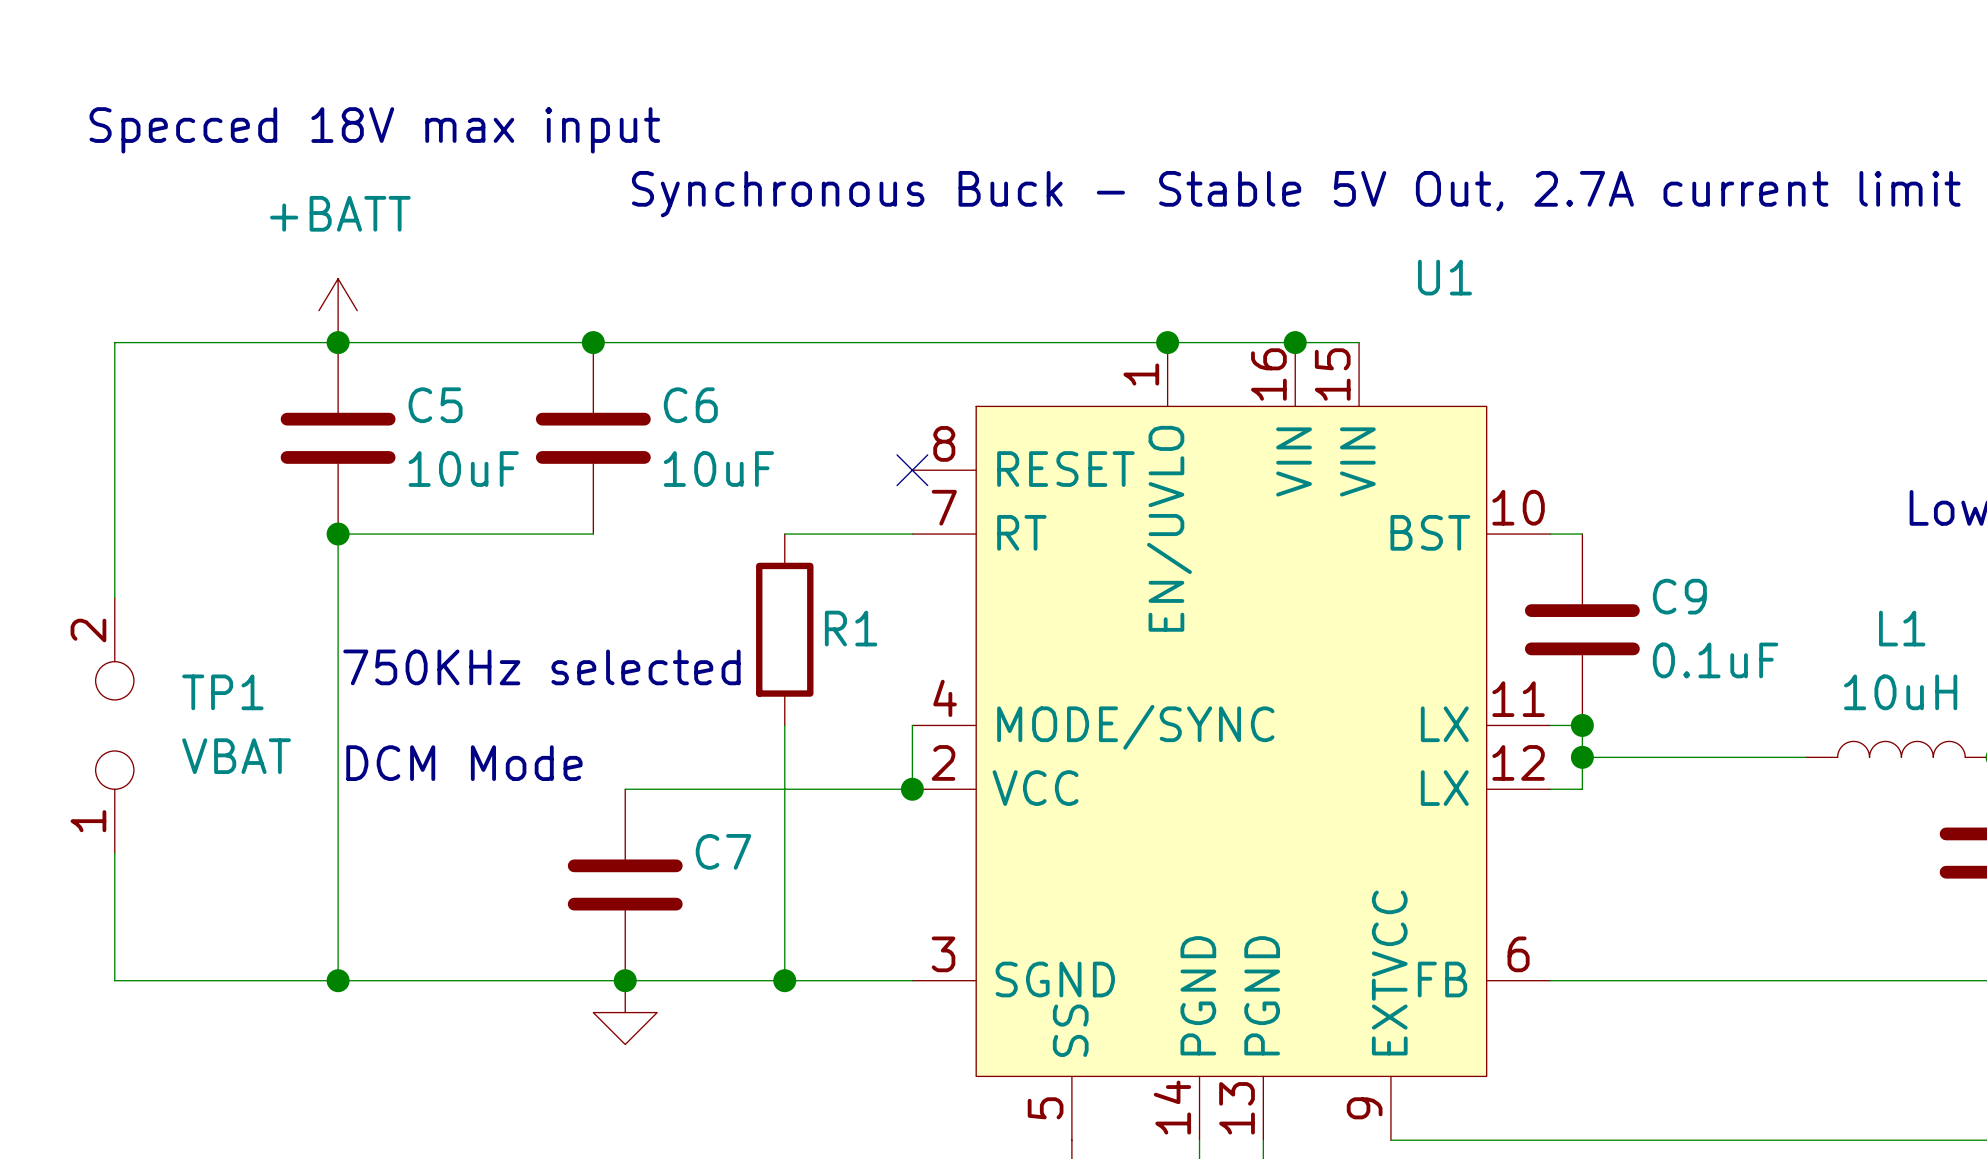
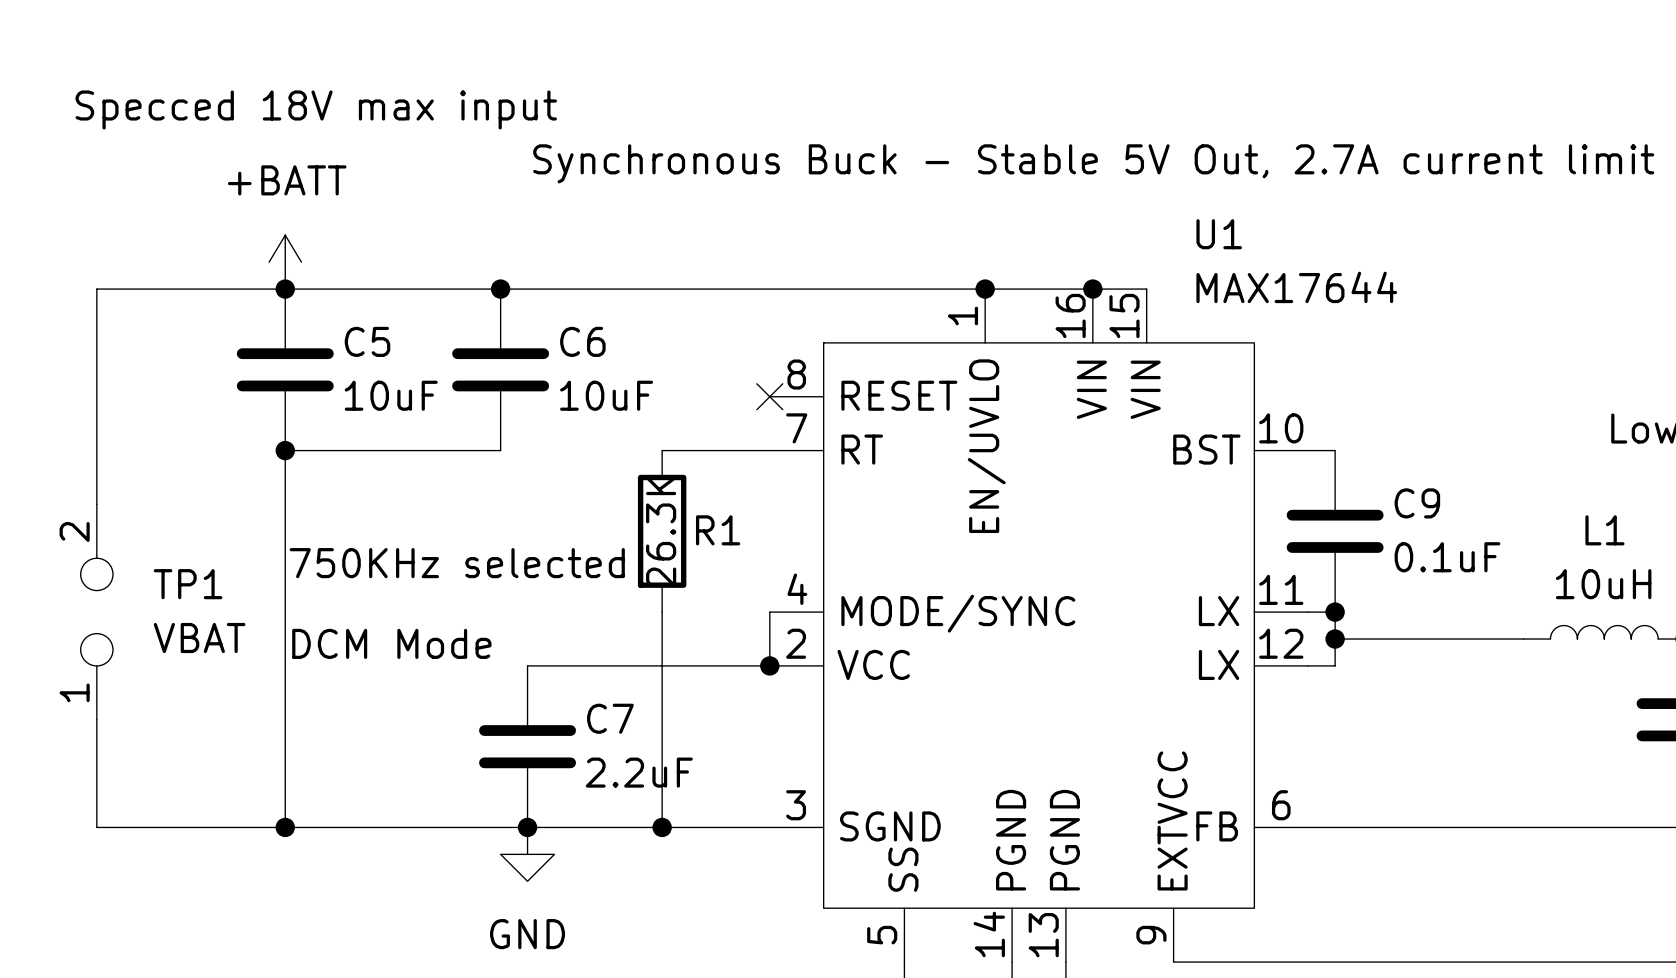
U1 value: none -> MAX17644 (1296, 287)
R1 value: none -> 26.3K (661, 531)
C7 value: none -> 2.2uF (639, 772)
power symbol text: none -> GND (527, 934)

